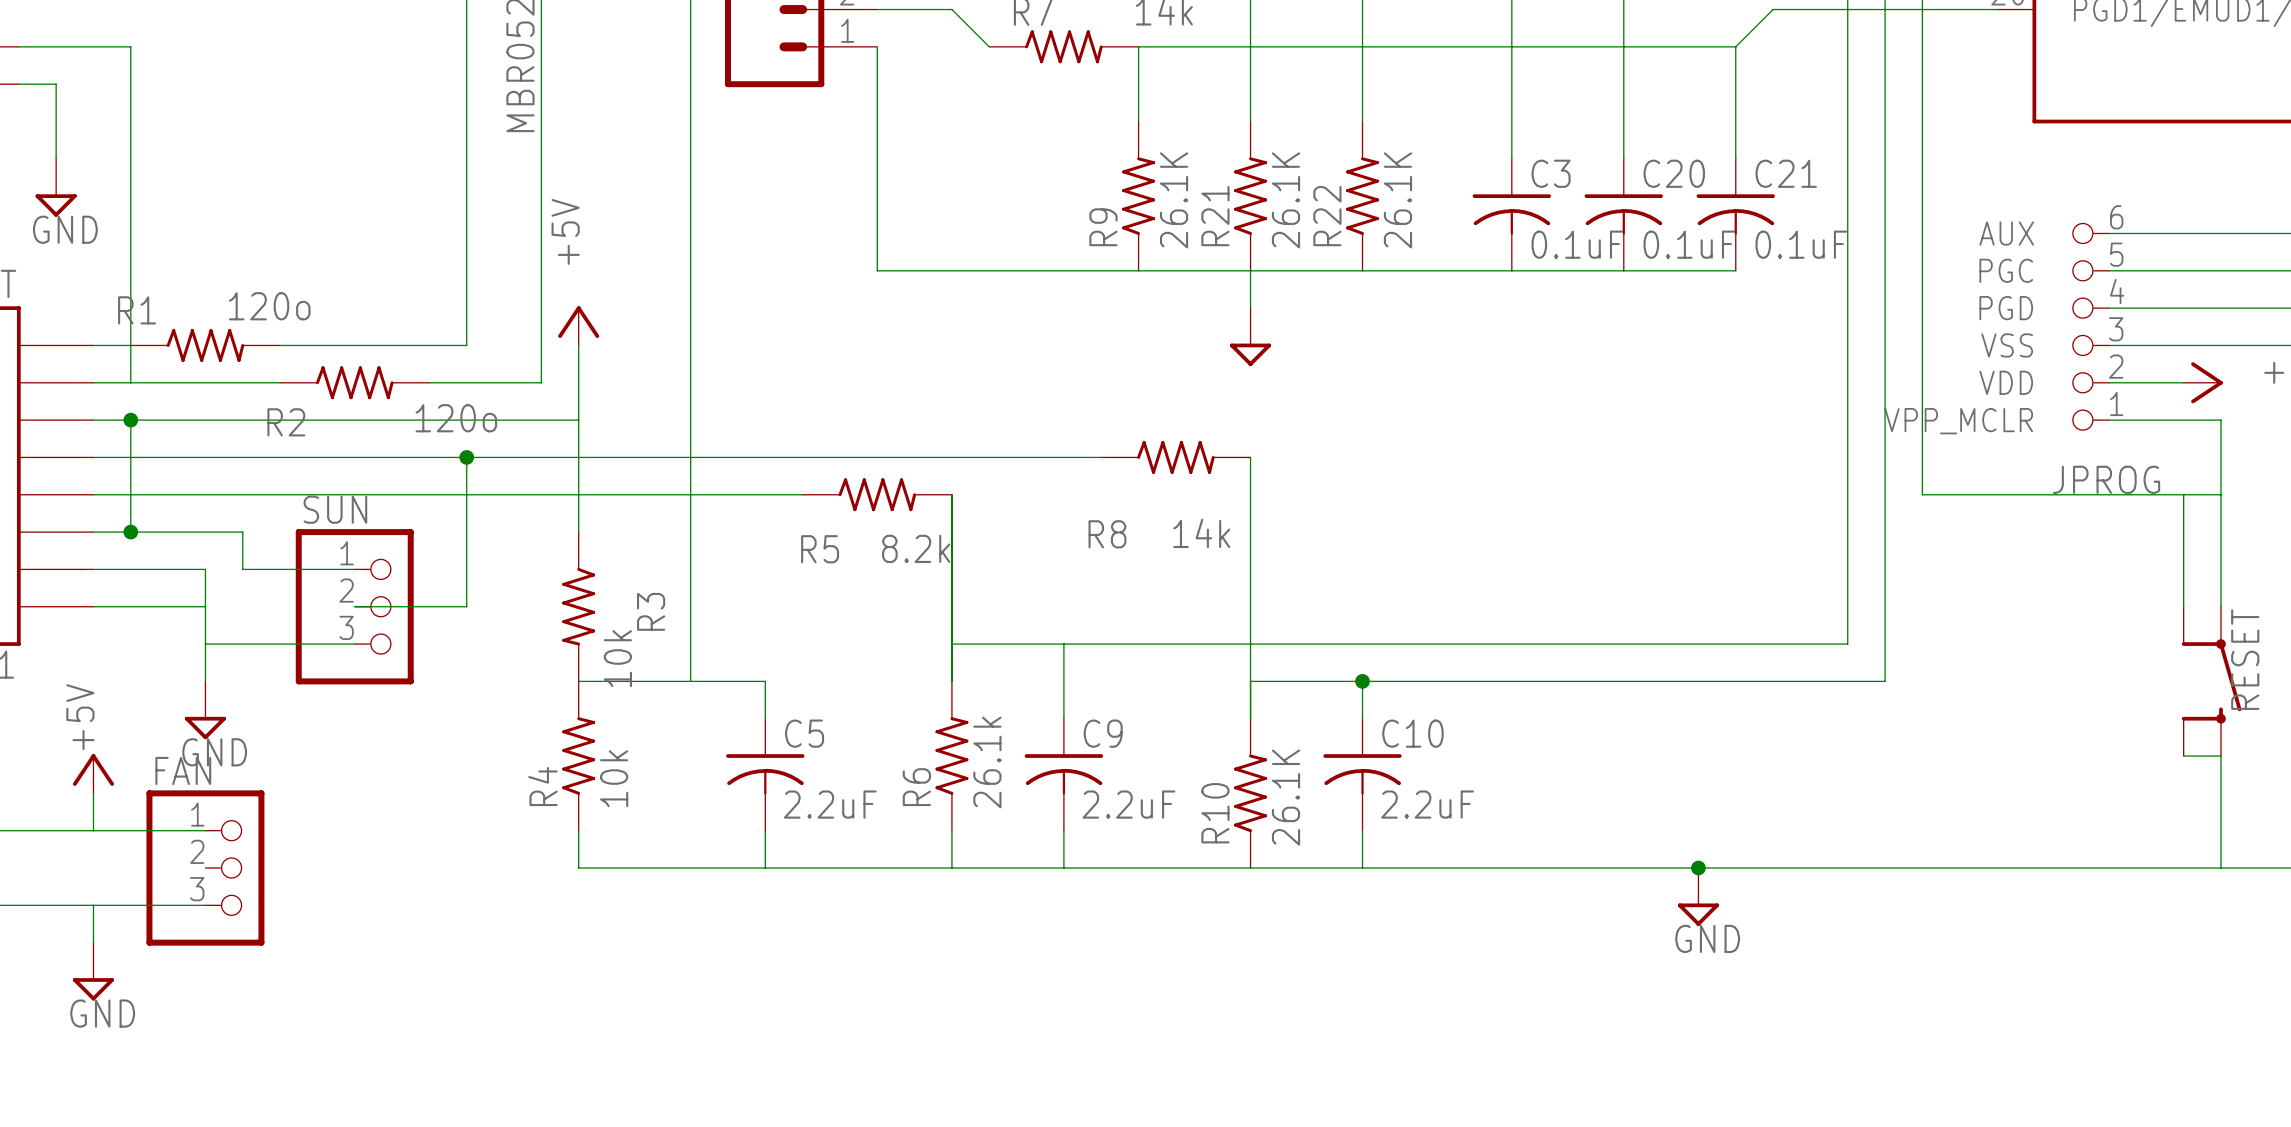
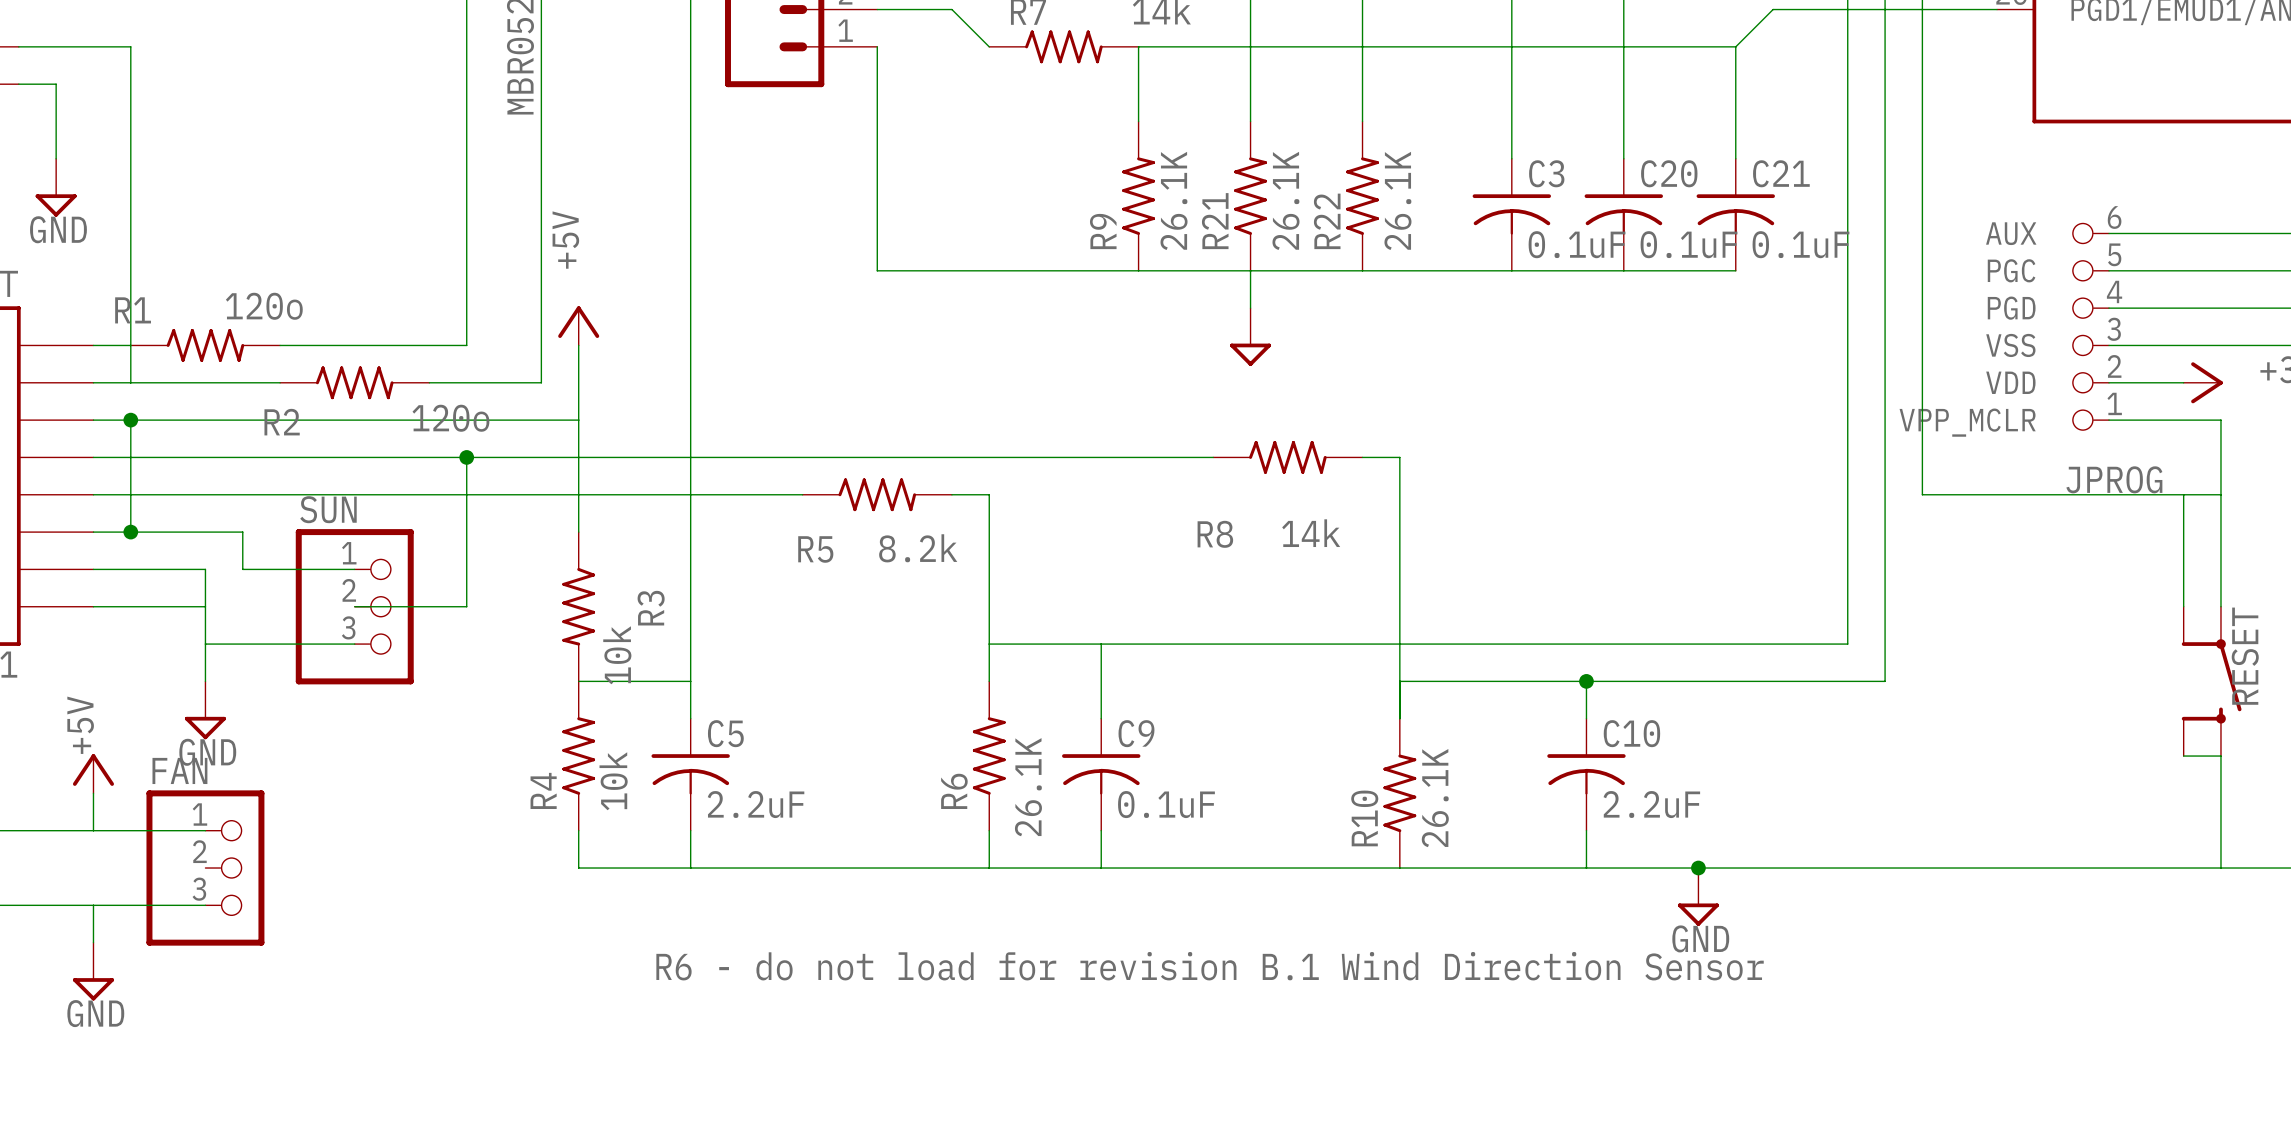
R8 position: (1175, 457) -> (1287, 457)
wire: (1250, 457) (1250, 718) -> none
wire: none -> (1362, 457) (1399, 457) (1399, 718)
wire: (951, 494) (951, 681) -> (951, 494) (989, 494) (989, 681)
wire: (951, 644) (989, 644) -> none
wire: (1063, 644) (1063, 718) -> (1101, 644) (1101, 718)
wire: (690, 681) (765, 681) (765, 718) -> (690, 681) (690, 718)
wire: (1250, 681) (1399, 681) -> none
wire: (1362, 681) (1362, 718) -> (1586, 681) (1586, 718)
junction: (1362, 681) -> none
junction: none -> (1586, 681)
R6 position: (951, 756) -> (989, 756)
R6 value: 26.1k (987, 762) -> 26.1K (1028, 787)
C5 position: (765, 774) -> (690, 774)
C9 position: (1063, 774) -> (1101, 774)
C10 position: (1362, 774) -> (1586, 774)
R10 position: (1250, 793) -> (1399, 793)
C9 value: 2.2uF (1128, 804) -> 0.1uF (1166, 804)
wire: (765, 830) (765, 868) -> (690, 830) (690, 868)
wire: (951, 830) (951, 868) -> (989, 830) (989, 868)
wire: (1063, 830) (1063, 868) -> (1101, 830) (1101, 868)
wire: (1362, 830) (1362, 868) -> (1586, 830) (1586, 868)
text: none -> R6 - do not load for revision B.1 Wind Direction Sensor (1210, 966)

